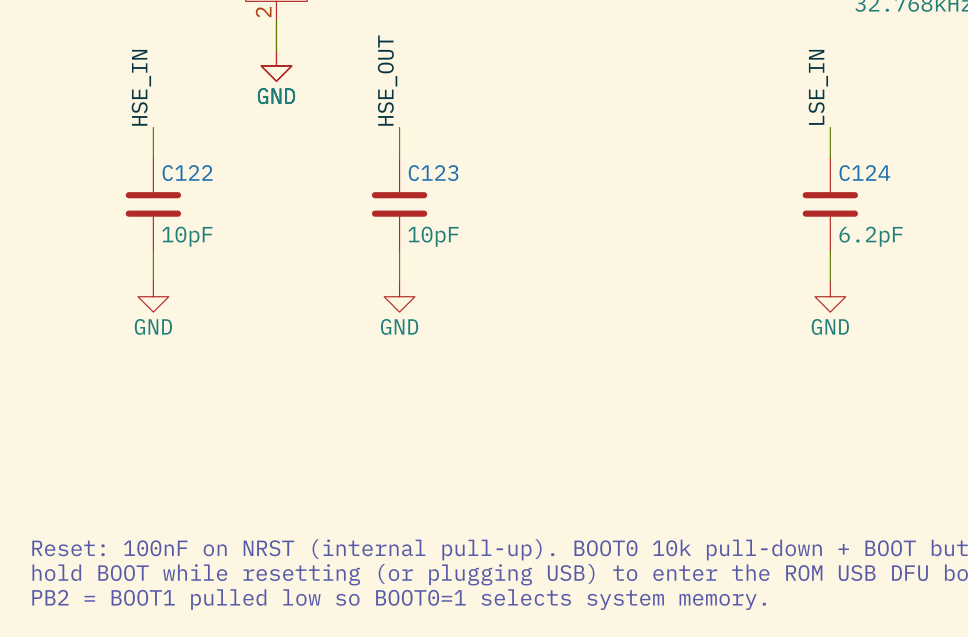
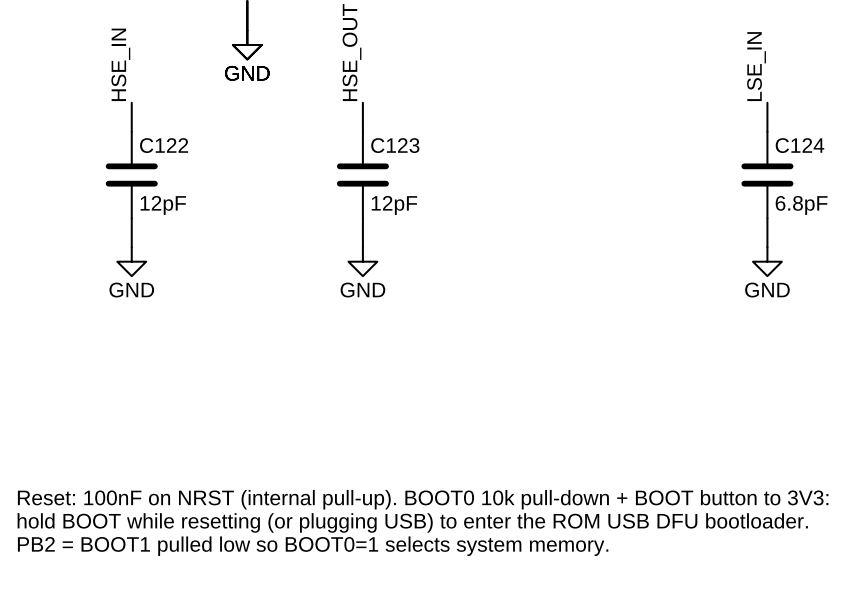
C122 value: 10pF (187, 236) -> 12pF (163, 205)
C123 value: 10pF (433, 236) -> 12pF (394, 205)
C124 value: 6.2pF (871, 236) -> 6.8pF (801, 205)

